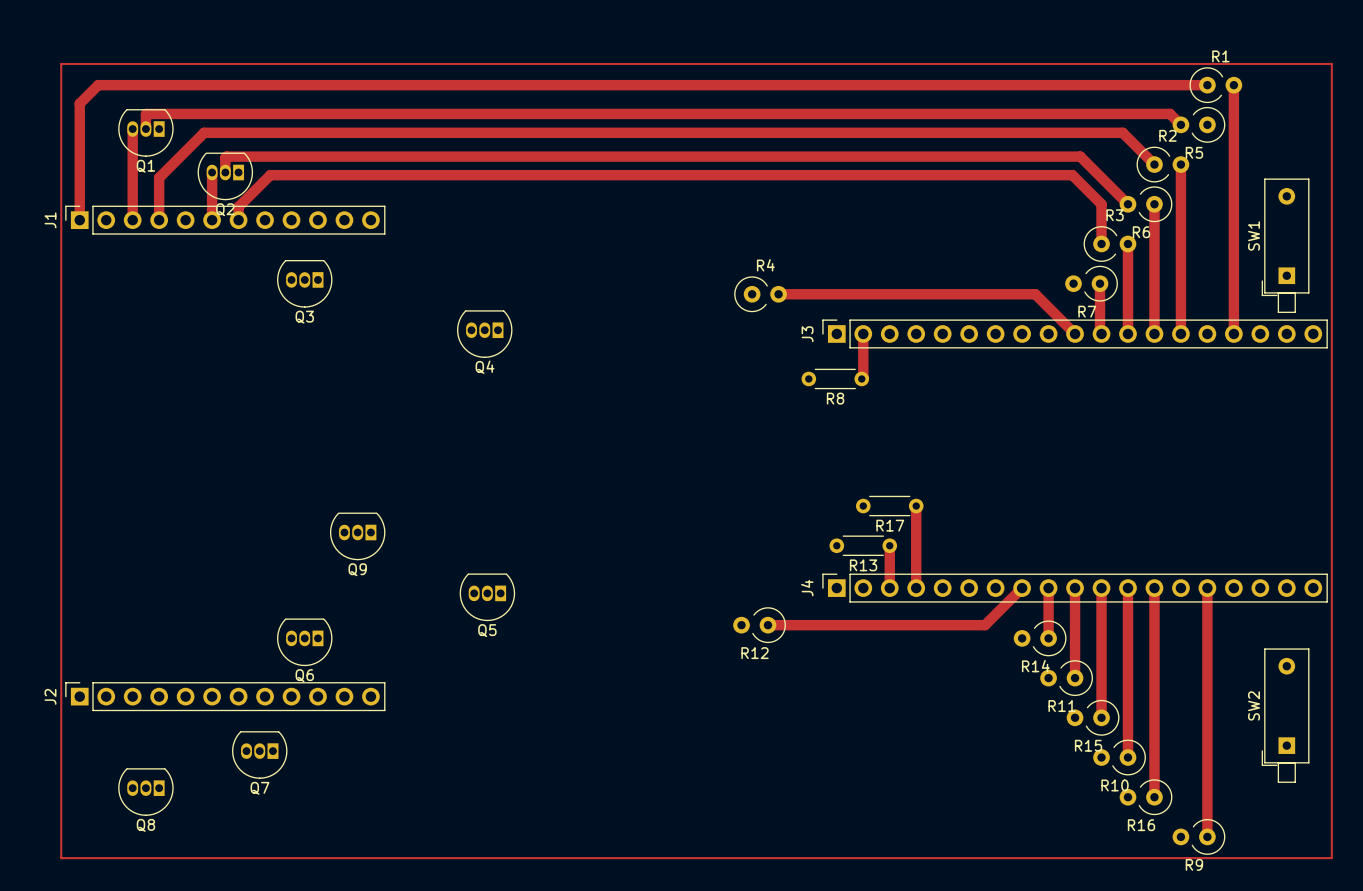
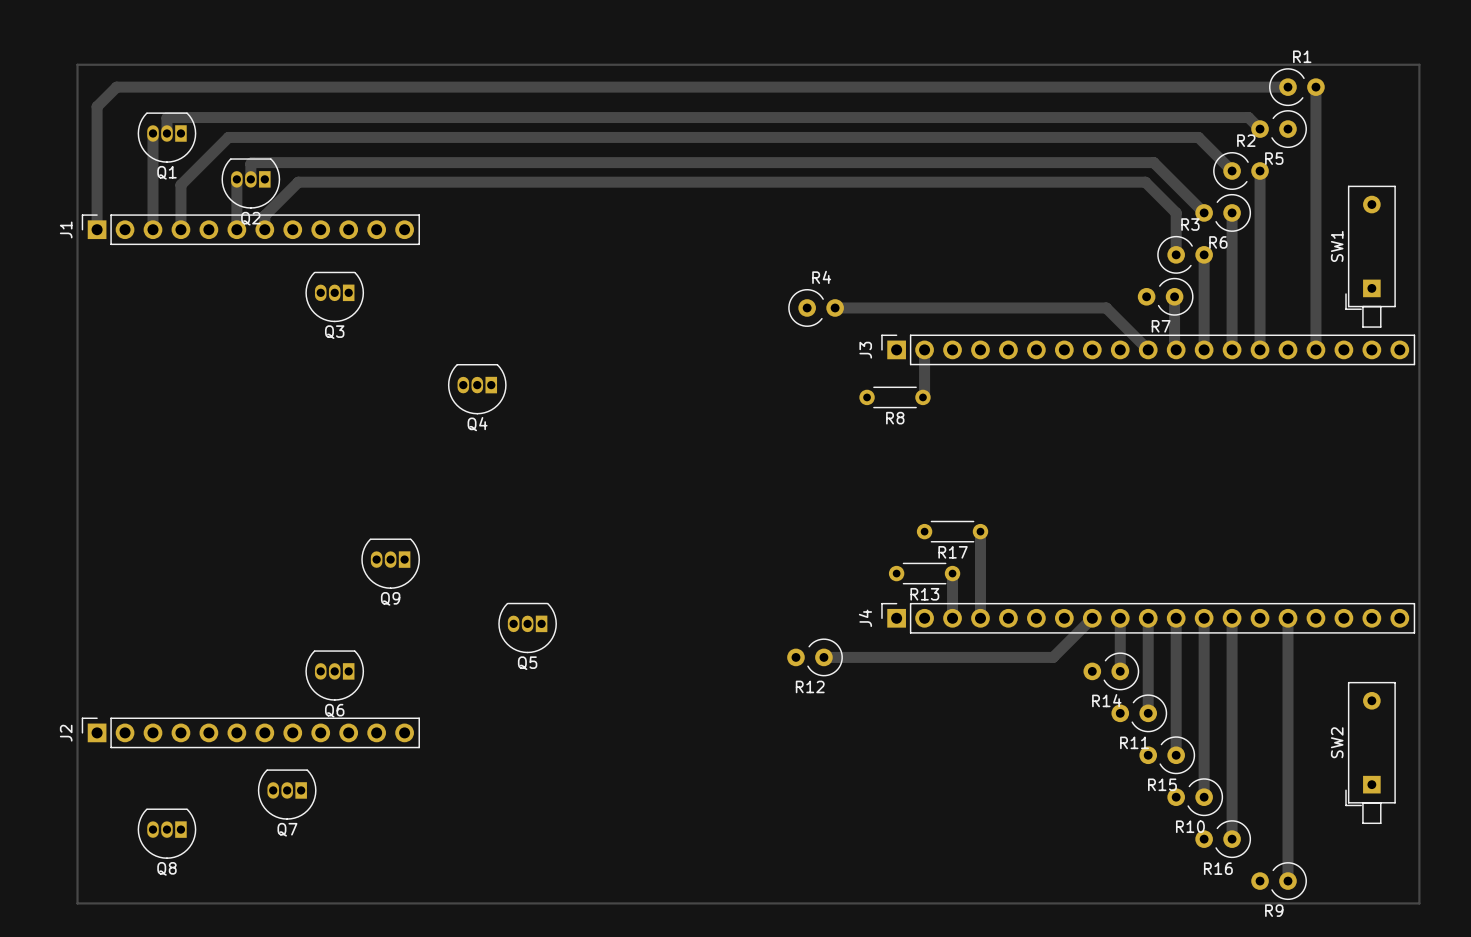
Q4 position: (484, 334) -> (477, 389)

